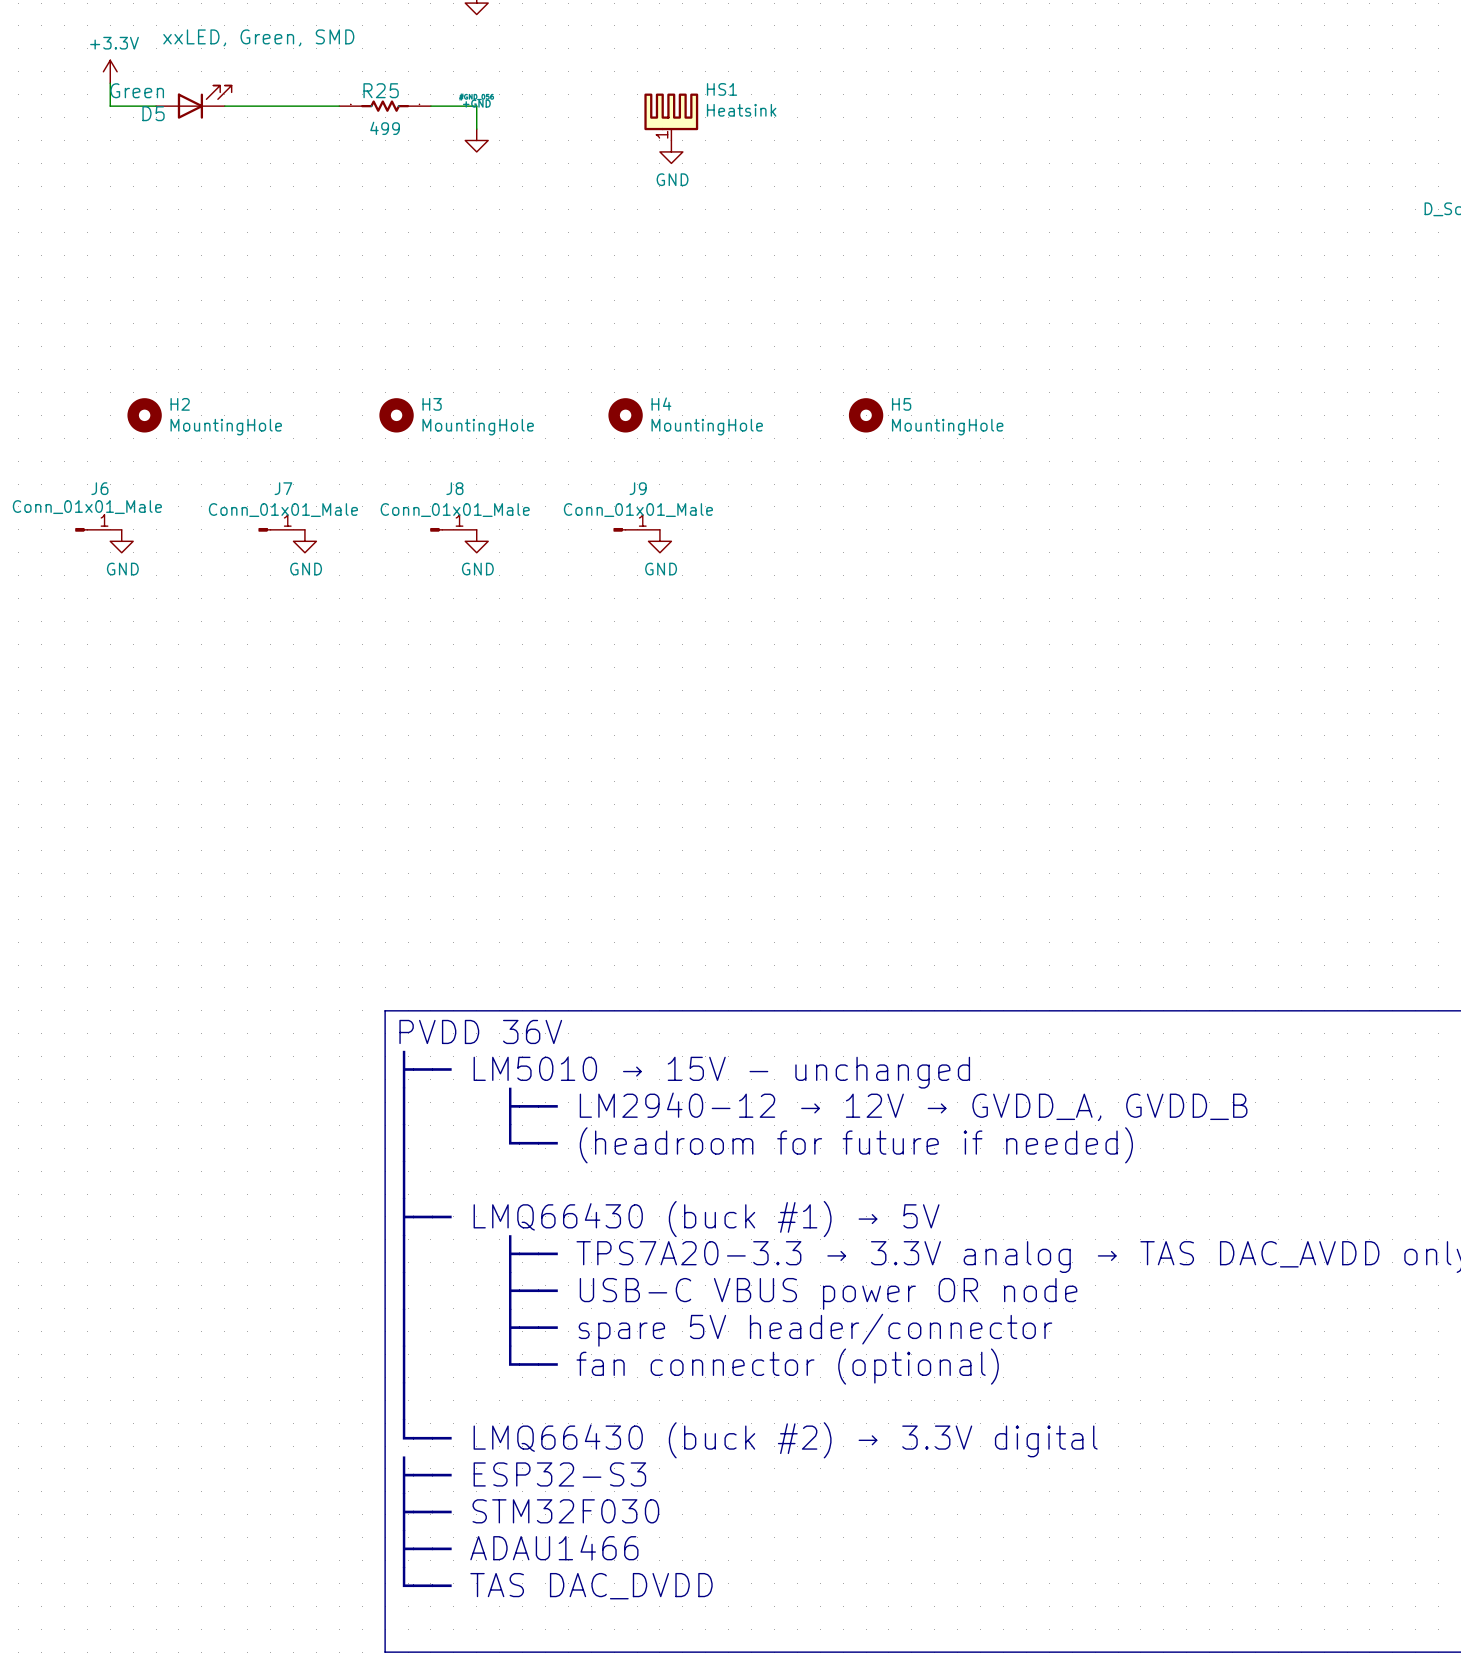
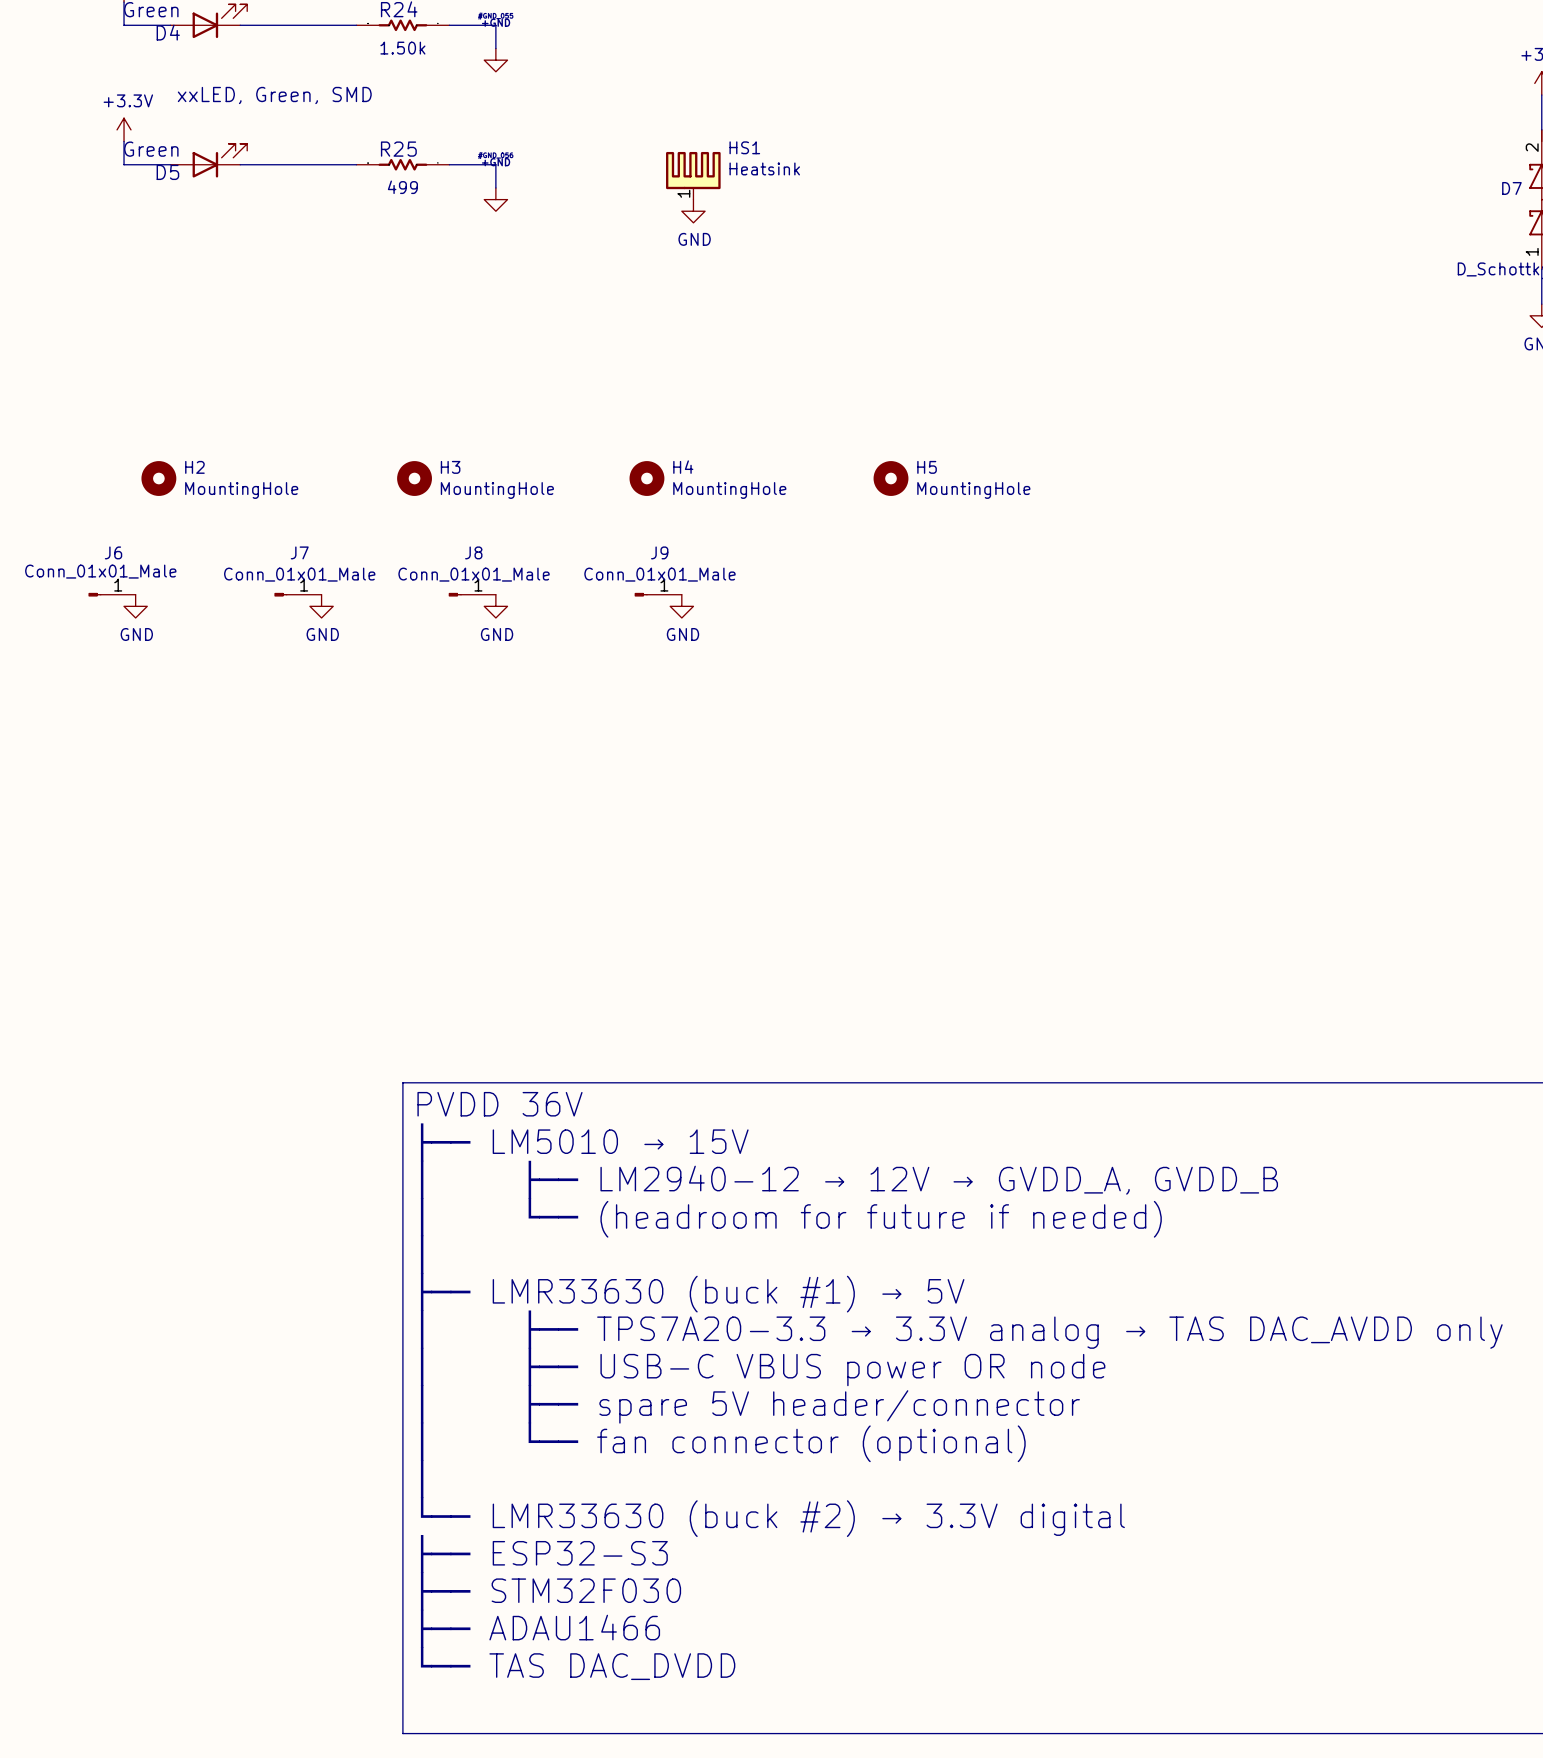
text: ├── LM5010 → 15V - unchanged (686, 1069) -> ├── LM5010 → 15V (584, 1142)
text: ├── LMQ66430 (buck #1) → 5V (670, 1217) -> ├── LMR33630 (buck #1) → 5V (692, 1292)
text: └── LMQ66430 (buck #2) → 3.3V digital (749, 1438) -> └── LMR33630 (buck #2) → 3.3V digital (772, 1516)

